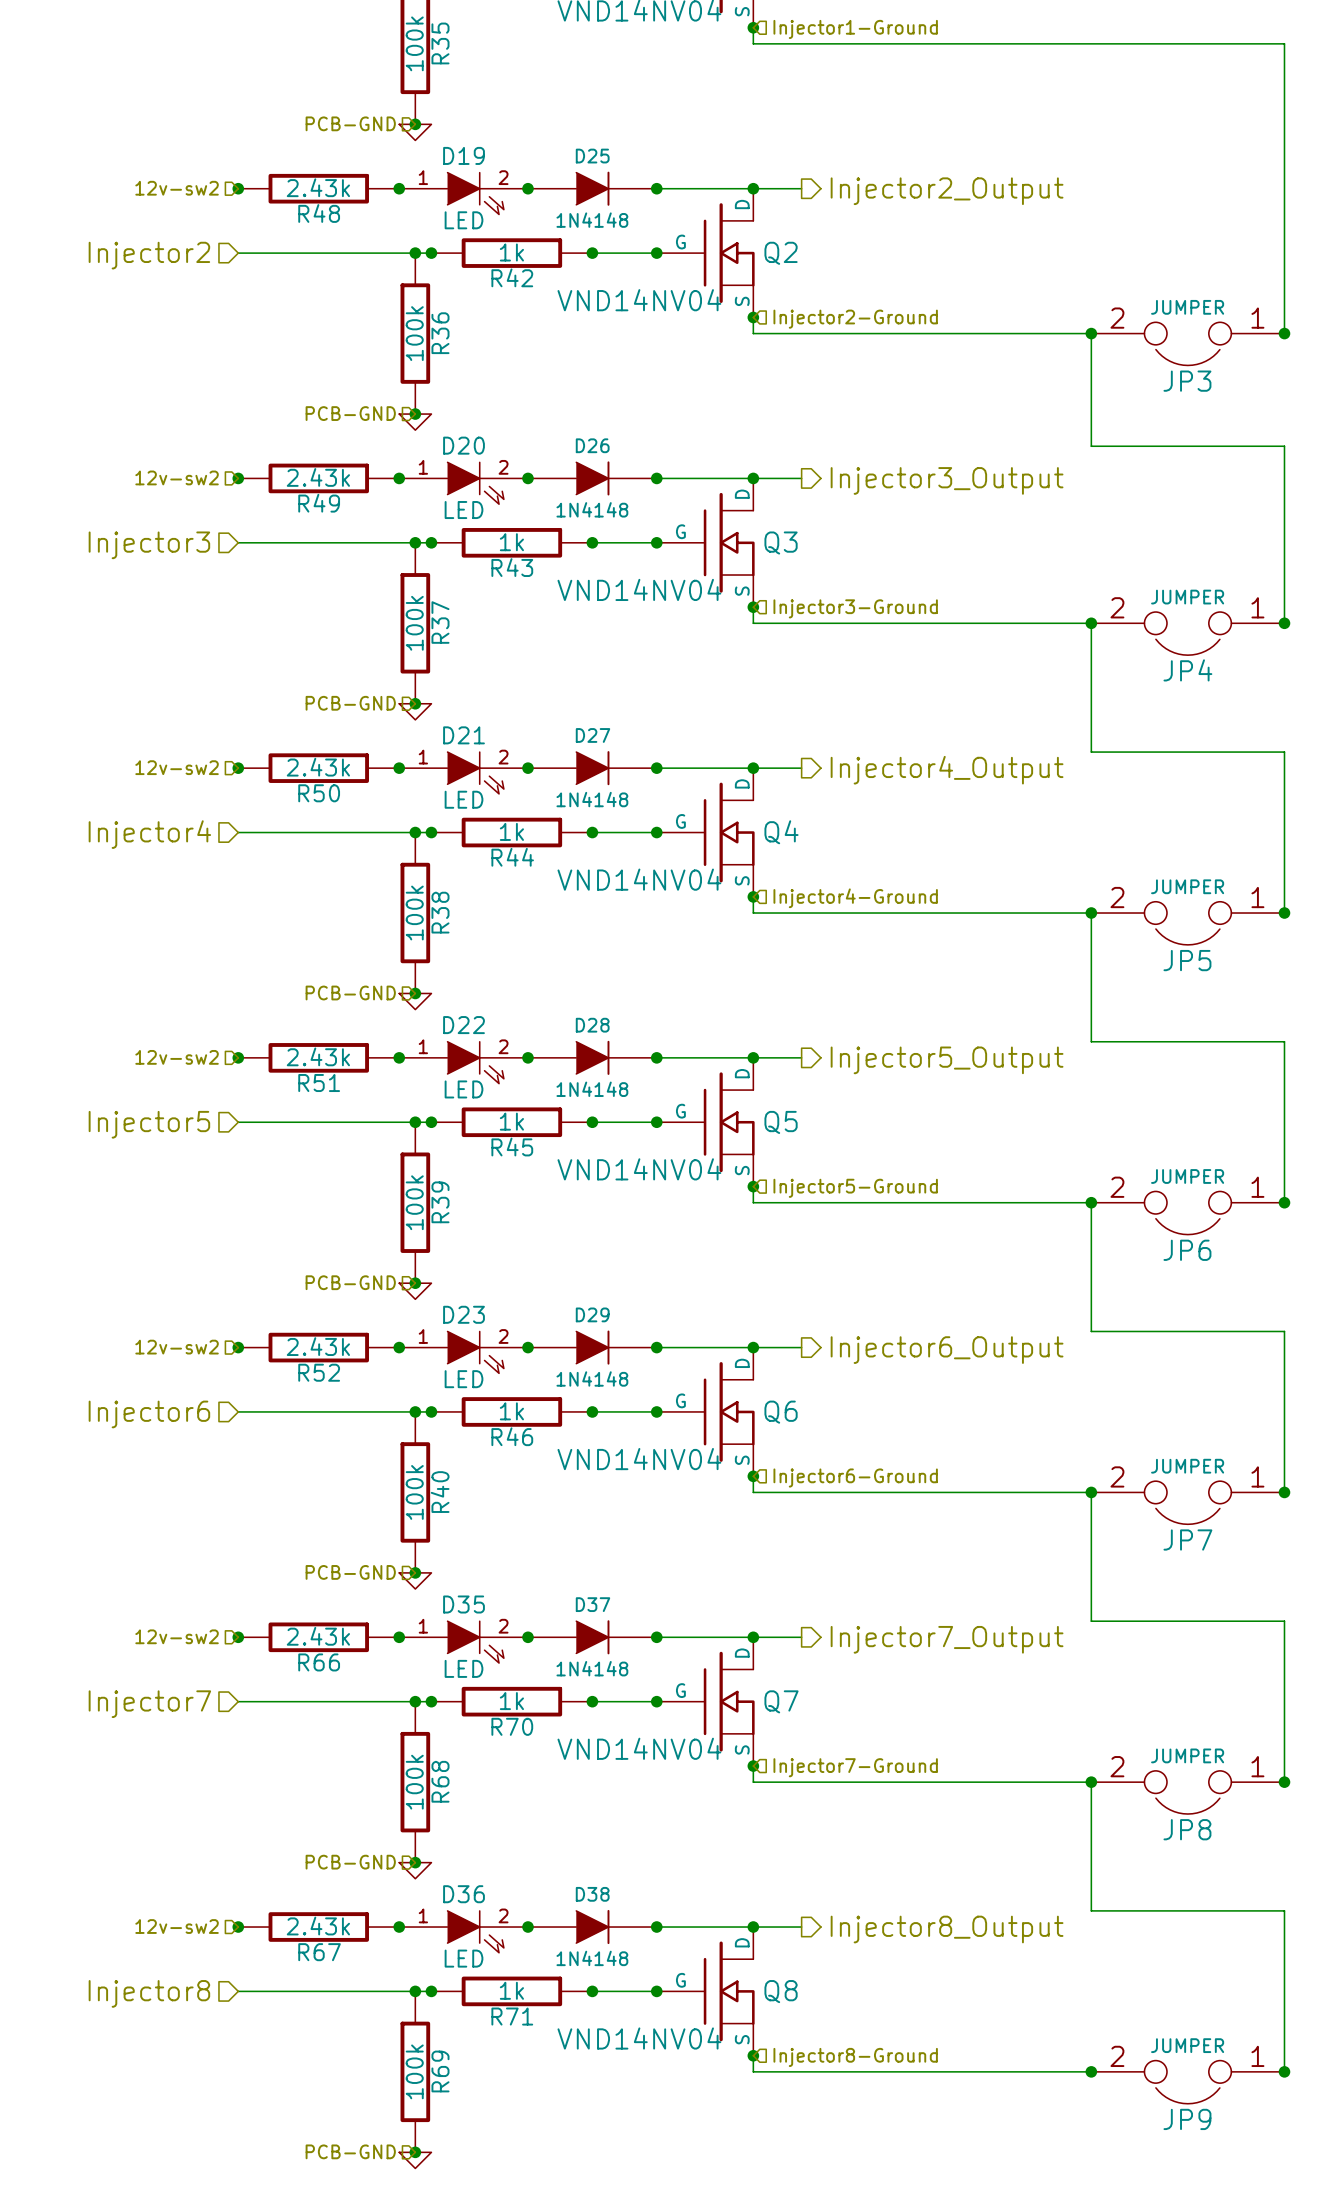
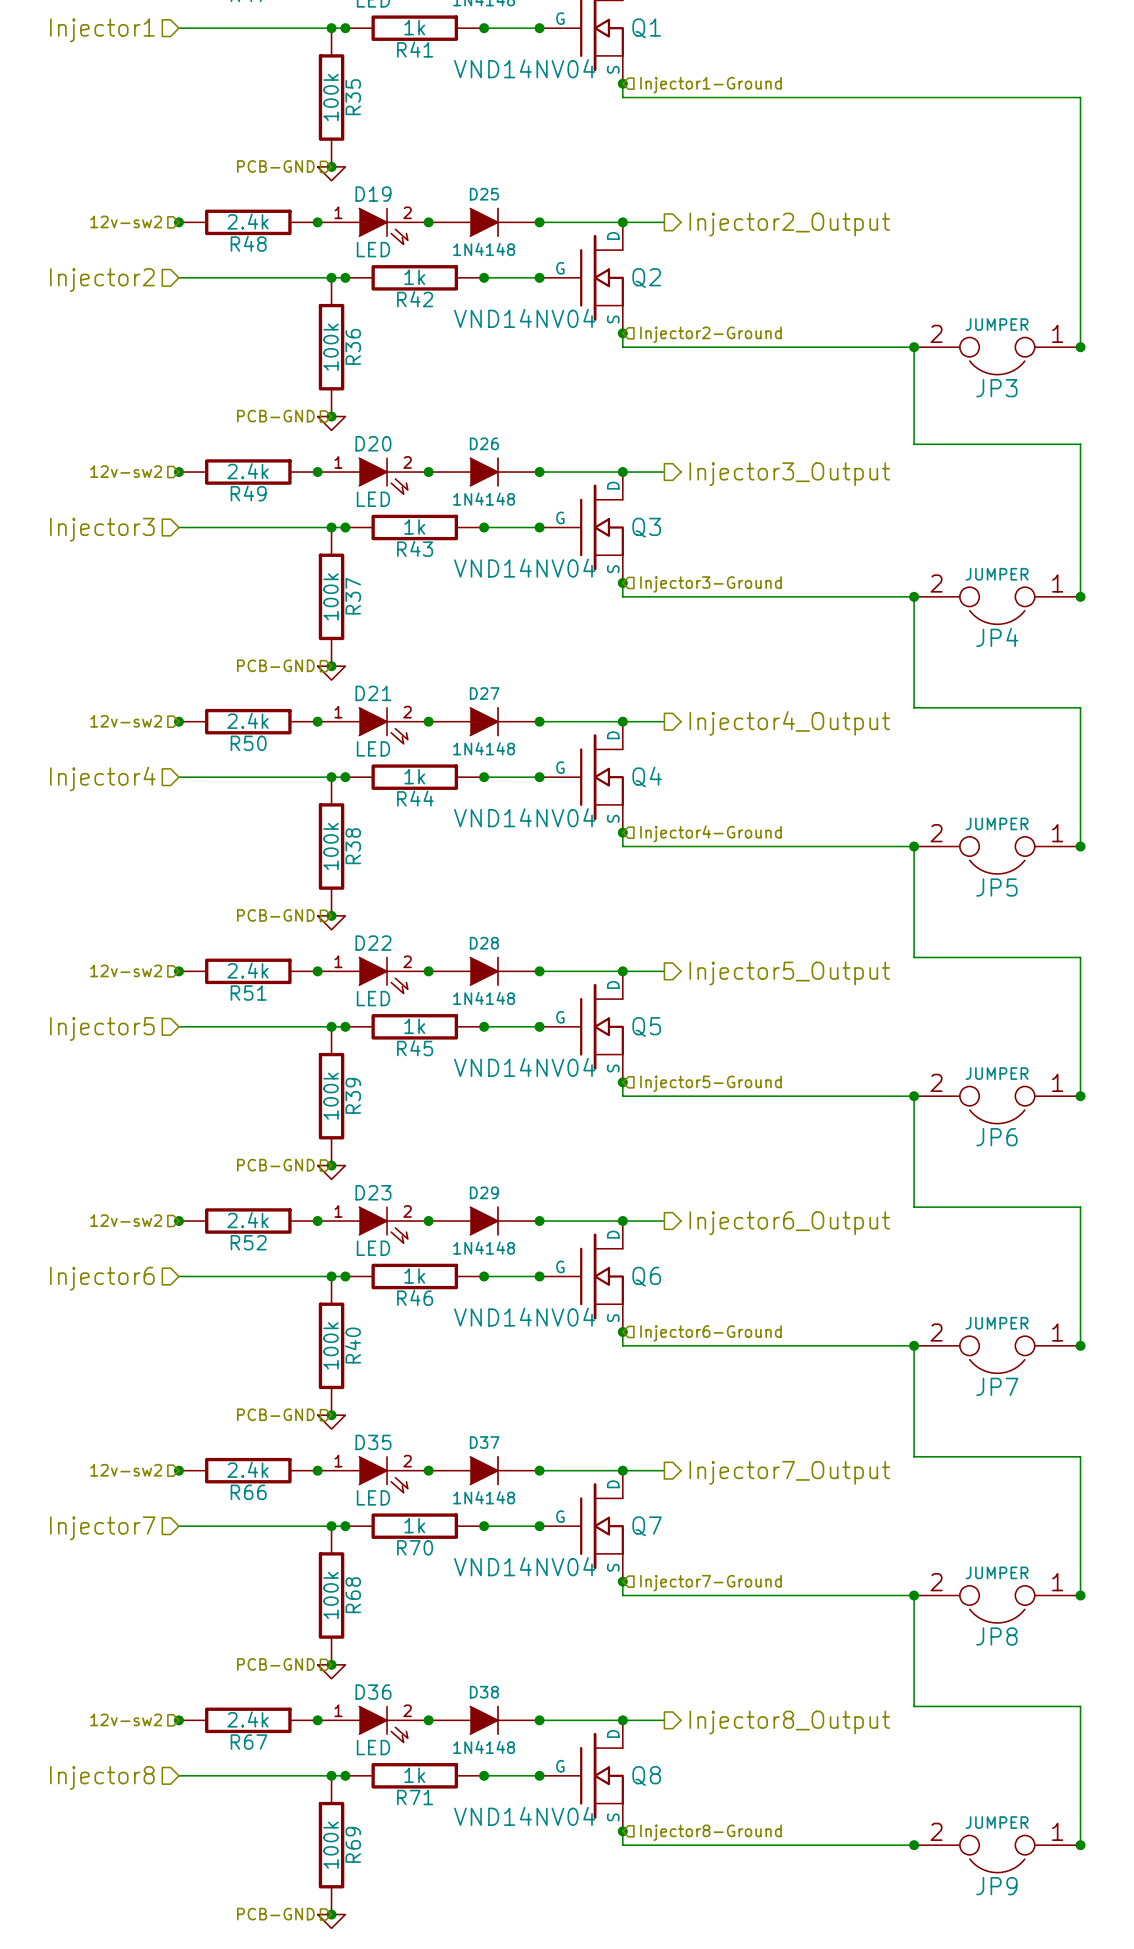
R48 value: 2.43k (318, 187) -> 2.4k (247, 221)
R49 value: 2.43k (318, 477) -> 2.4k (247, 471)
R50 value: 2.43k (318, 767) -> 2.4k (247, 720)
R51 value: 2.43k (318, 1056) -> 2.4k (247, 970)
R52 value: 2.43k (318, 1346) -> 2.4k (247, 1220)
R66 value: 2.43k (318, 1636) -> 2.4k (247, 1469)
R67 value: 2.43k (318, 1926) -> 2.4k (247, 1719)

